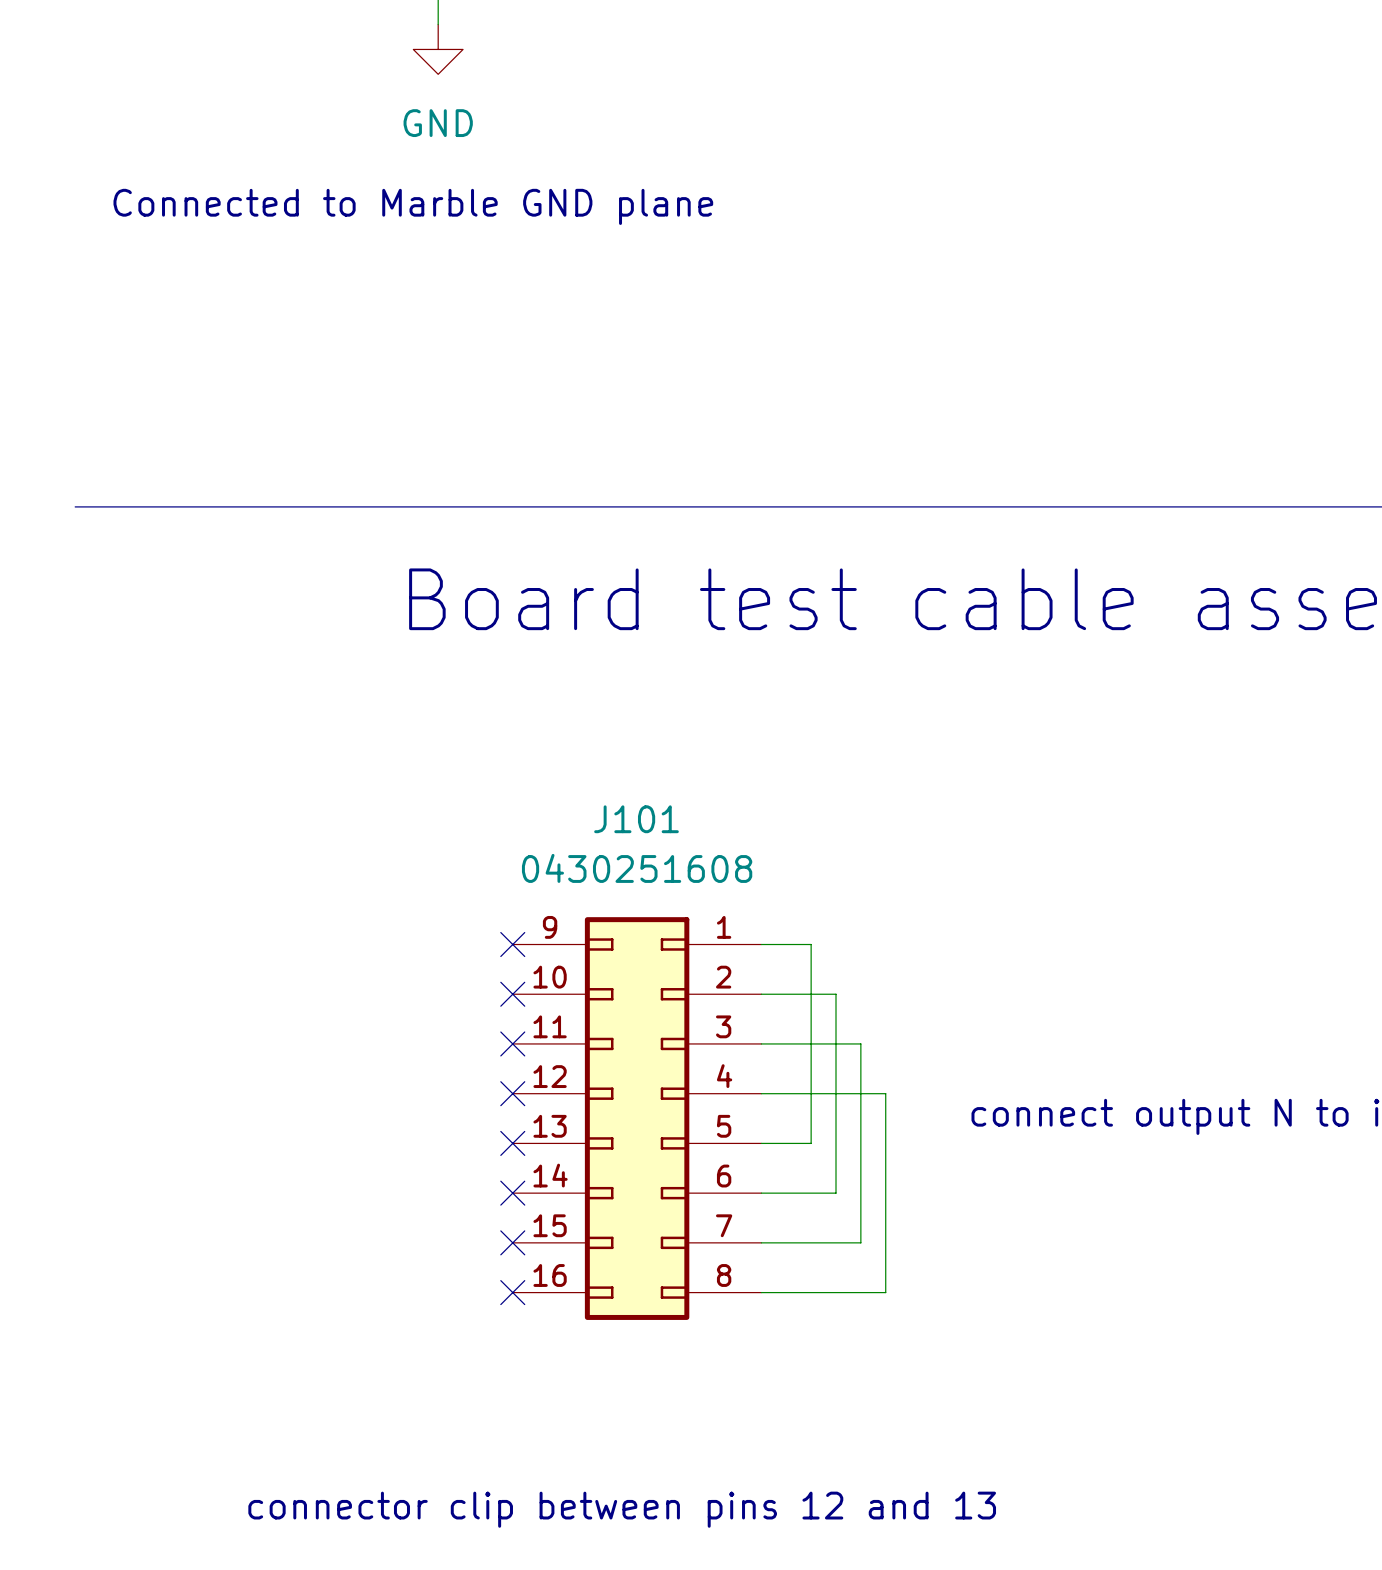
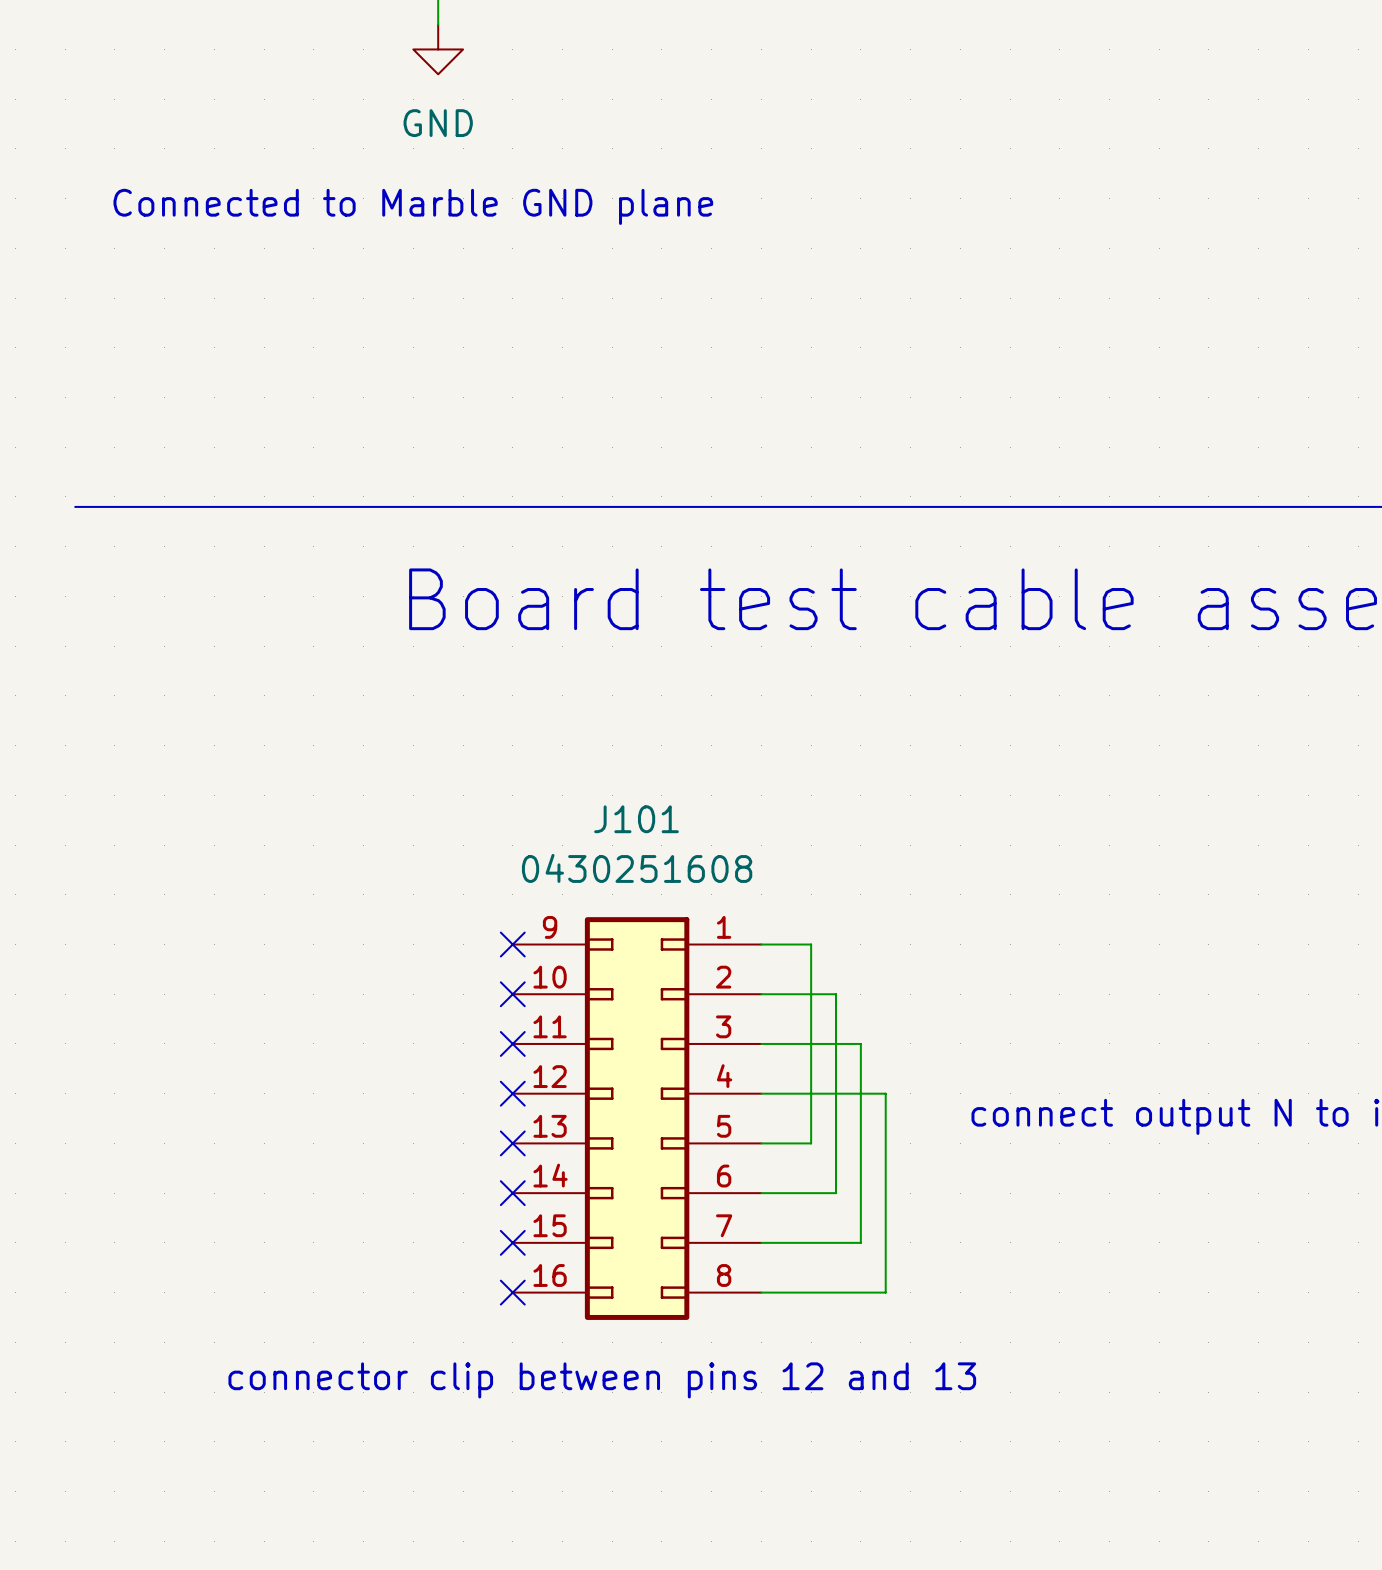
text position: connector clip between pins 12 and 13 (622, 1509) -> connector clip between pins 12 and 13 (602, 1380)

